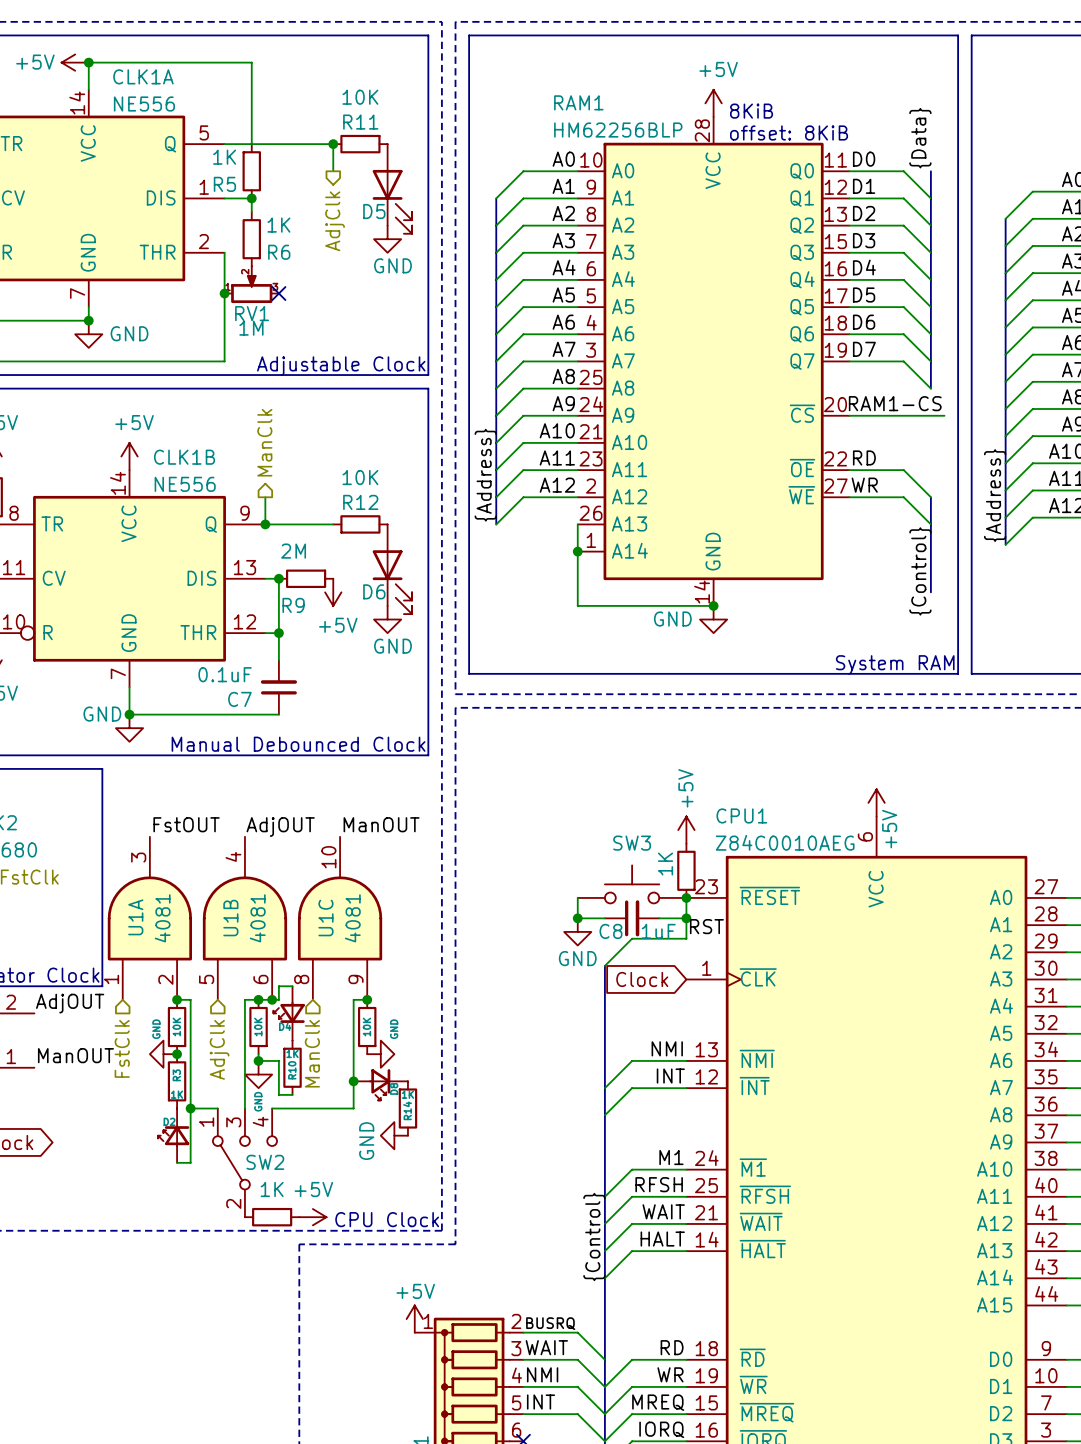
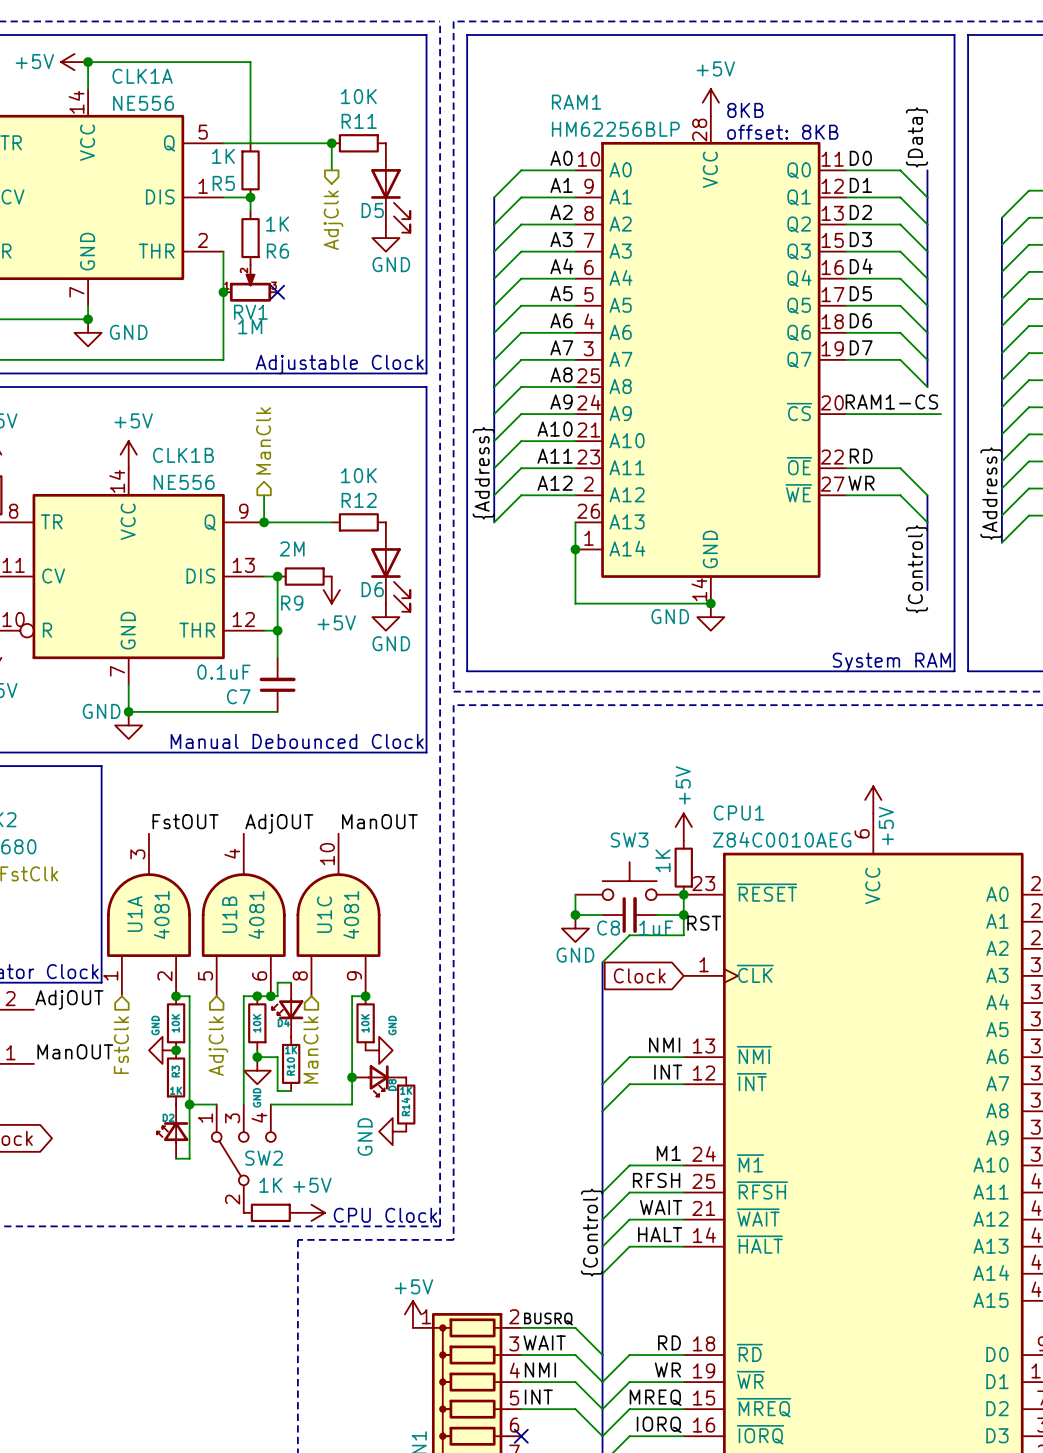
text: 8KiB (751, 111) -> 8KB (745, 110)
text: offset: 8KiB (789, 132) -> offset: 8KB (782, 132)

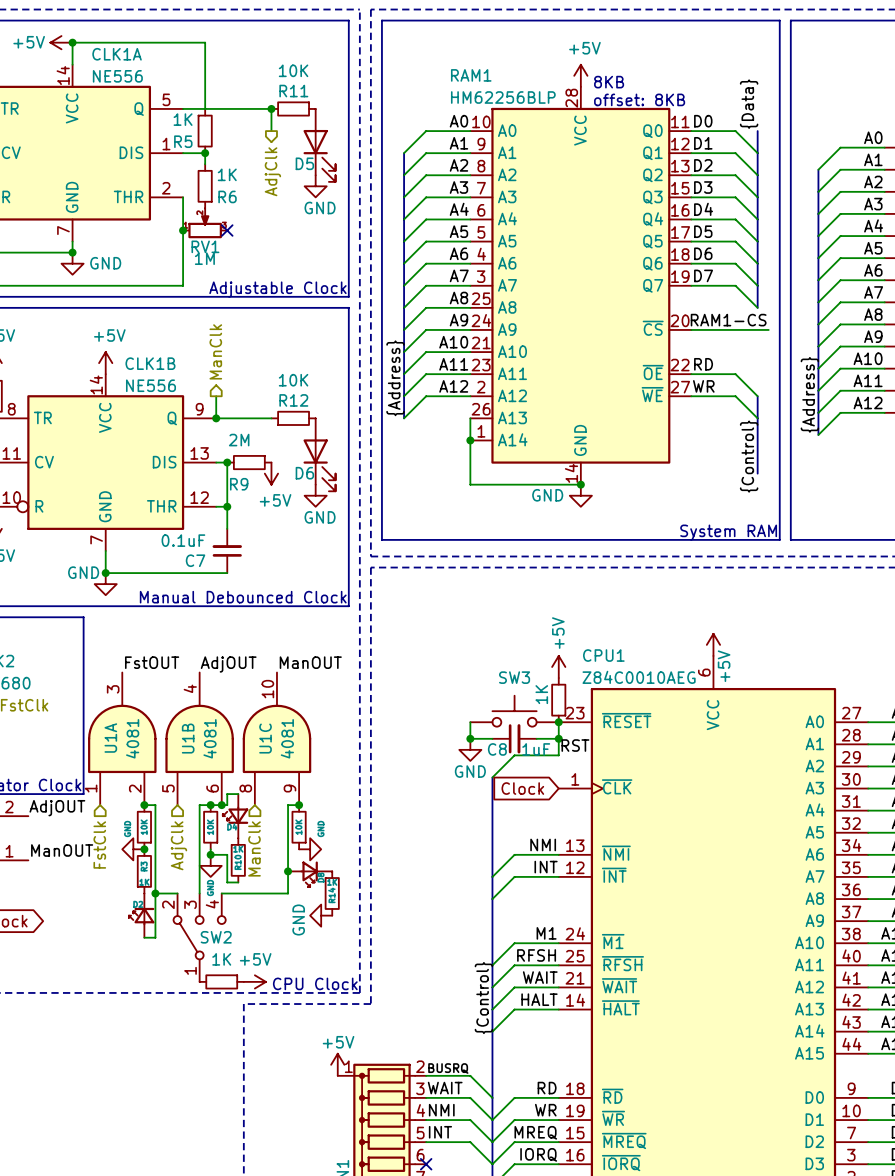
SW2 pin number: 1 (205, 1118) -> 2 (168, 904)
SW2 pin number: 2 (232, 1199) -> 1 (190, 970)

